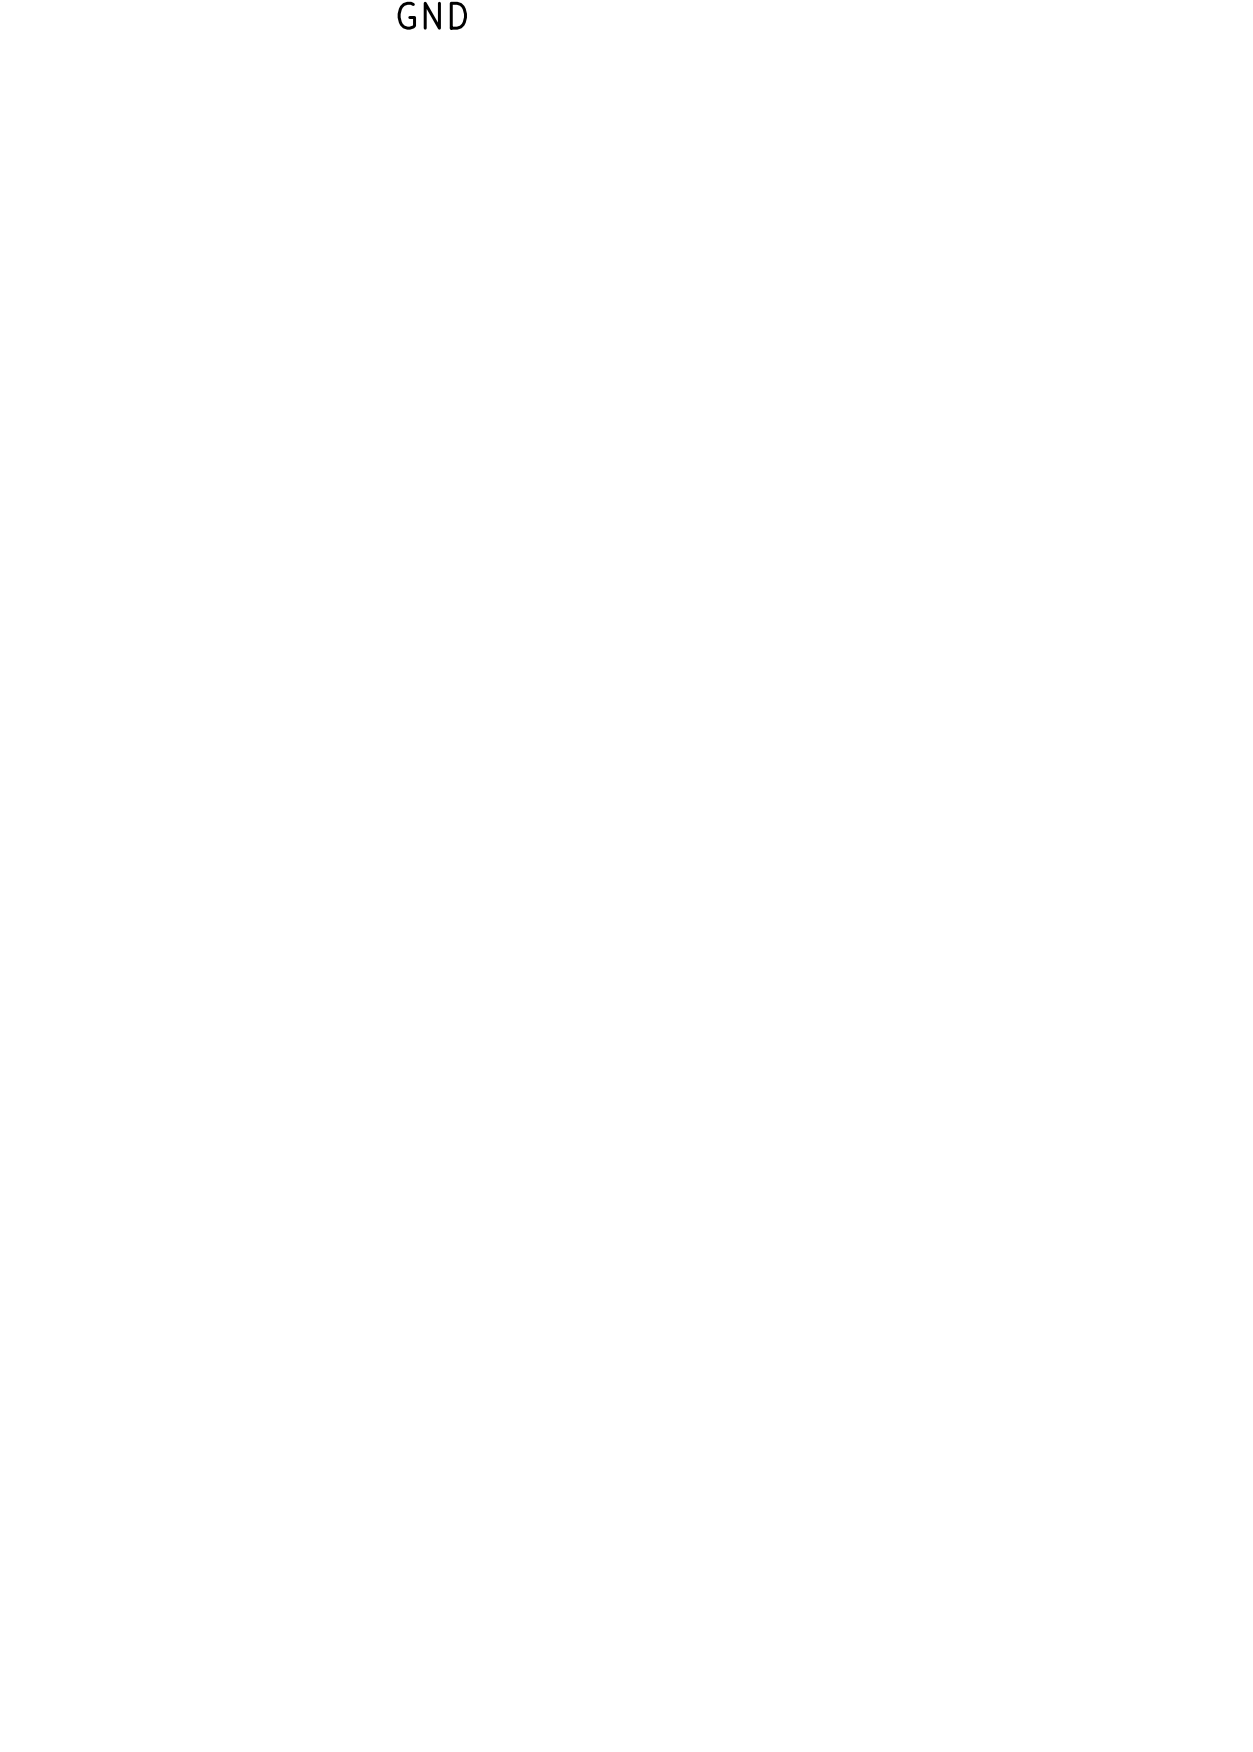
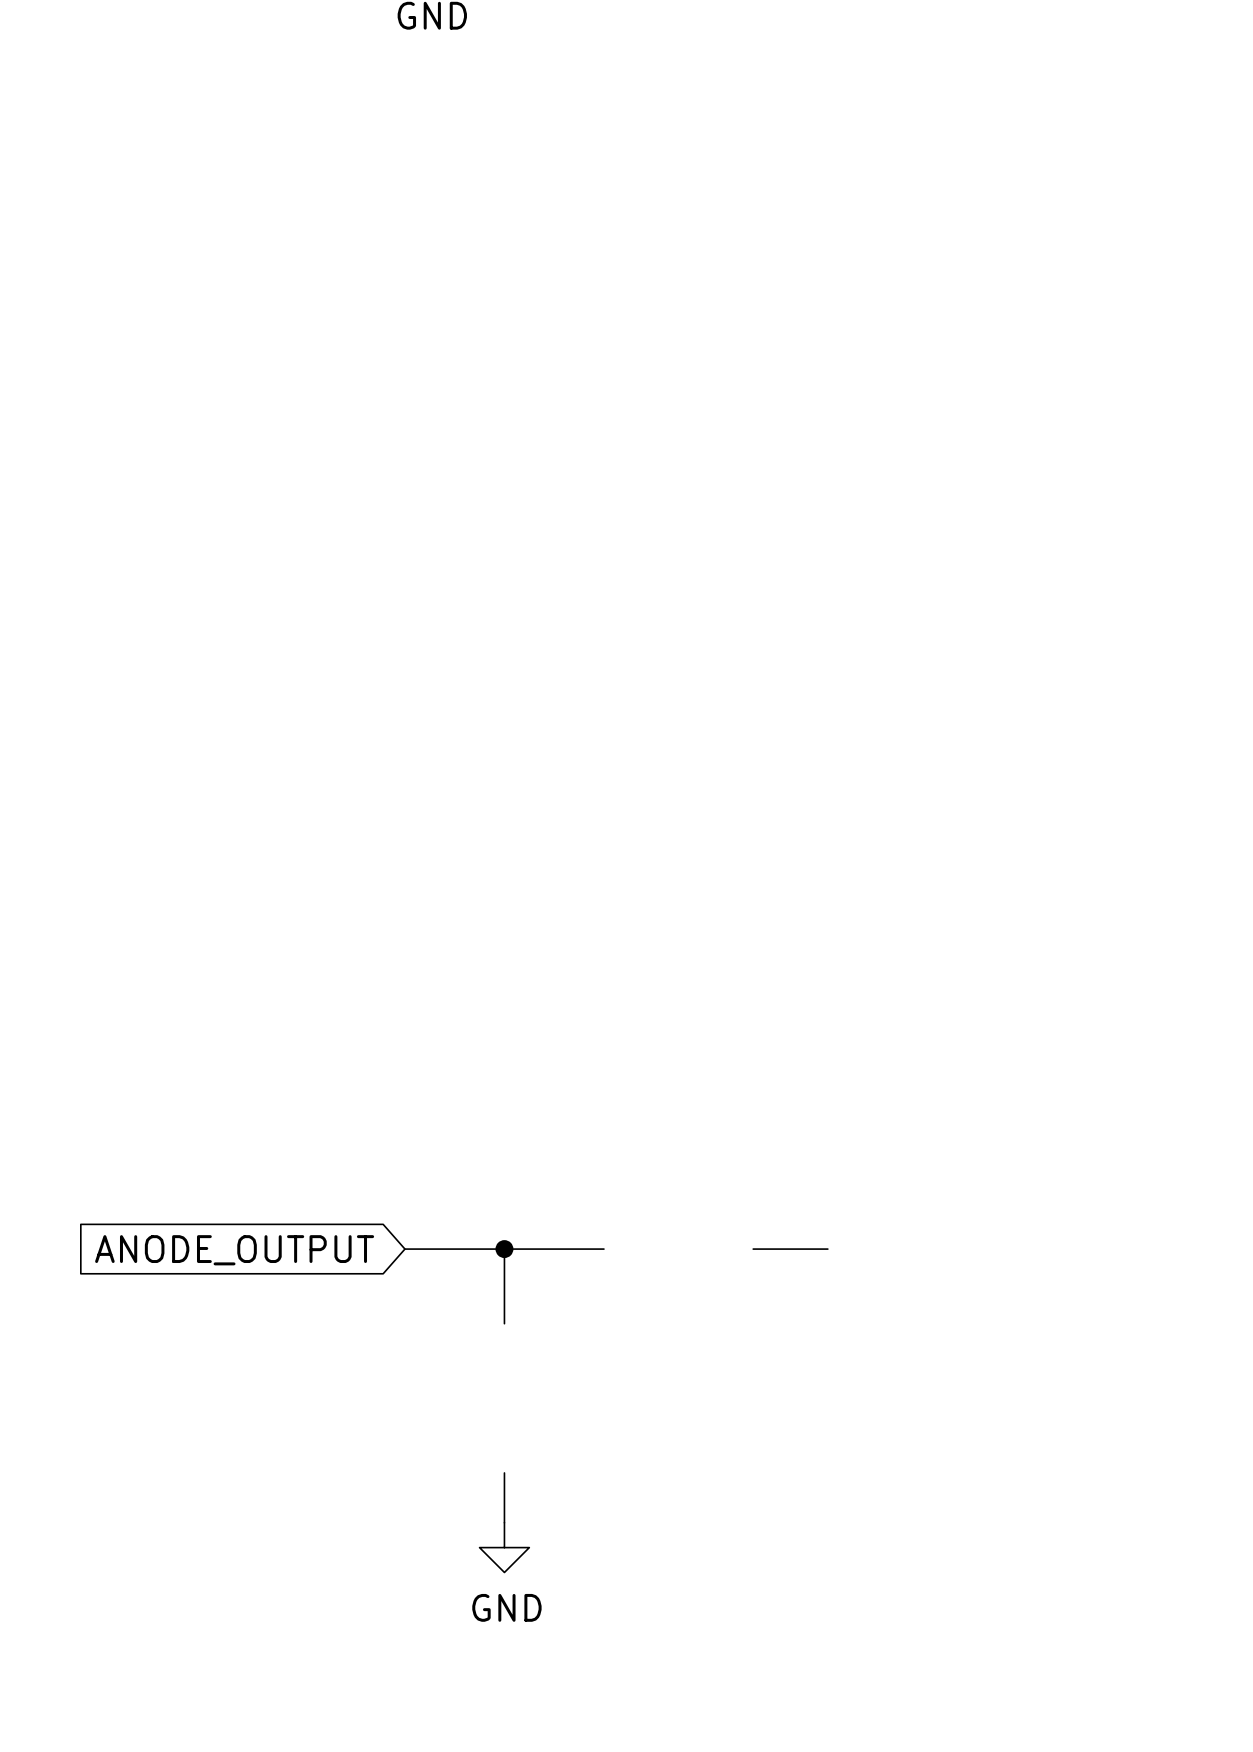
wire: none -> (404, 1249) (603, 1249)
wire: none -> (504, 1249) (504, 1323)
junction: none -> (504, 1249)
wire: none -> (753, 1249) (827, 1249)
global label: none -> ANODE_OUTPUT (234, 1250)
wire: none -> (504, 1472) (504, 1522)
power symbol: none -> GND (504, 1547)

